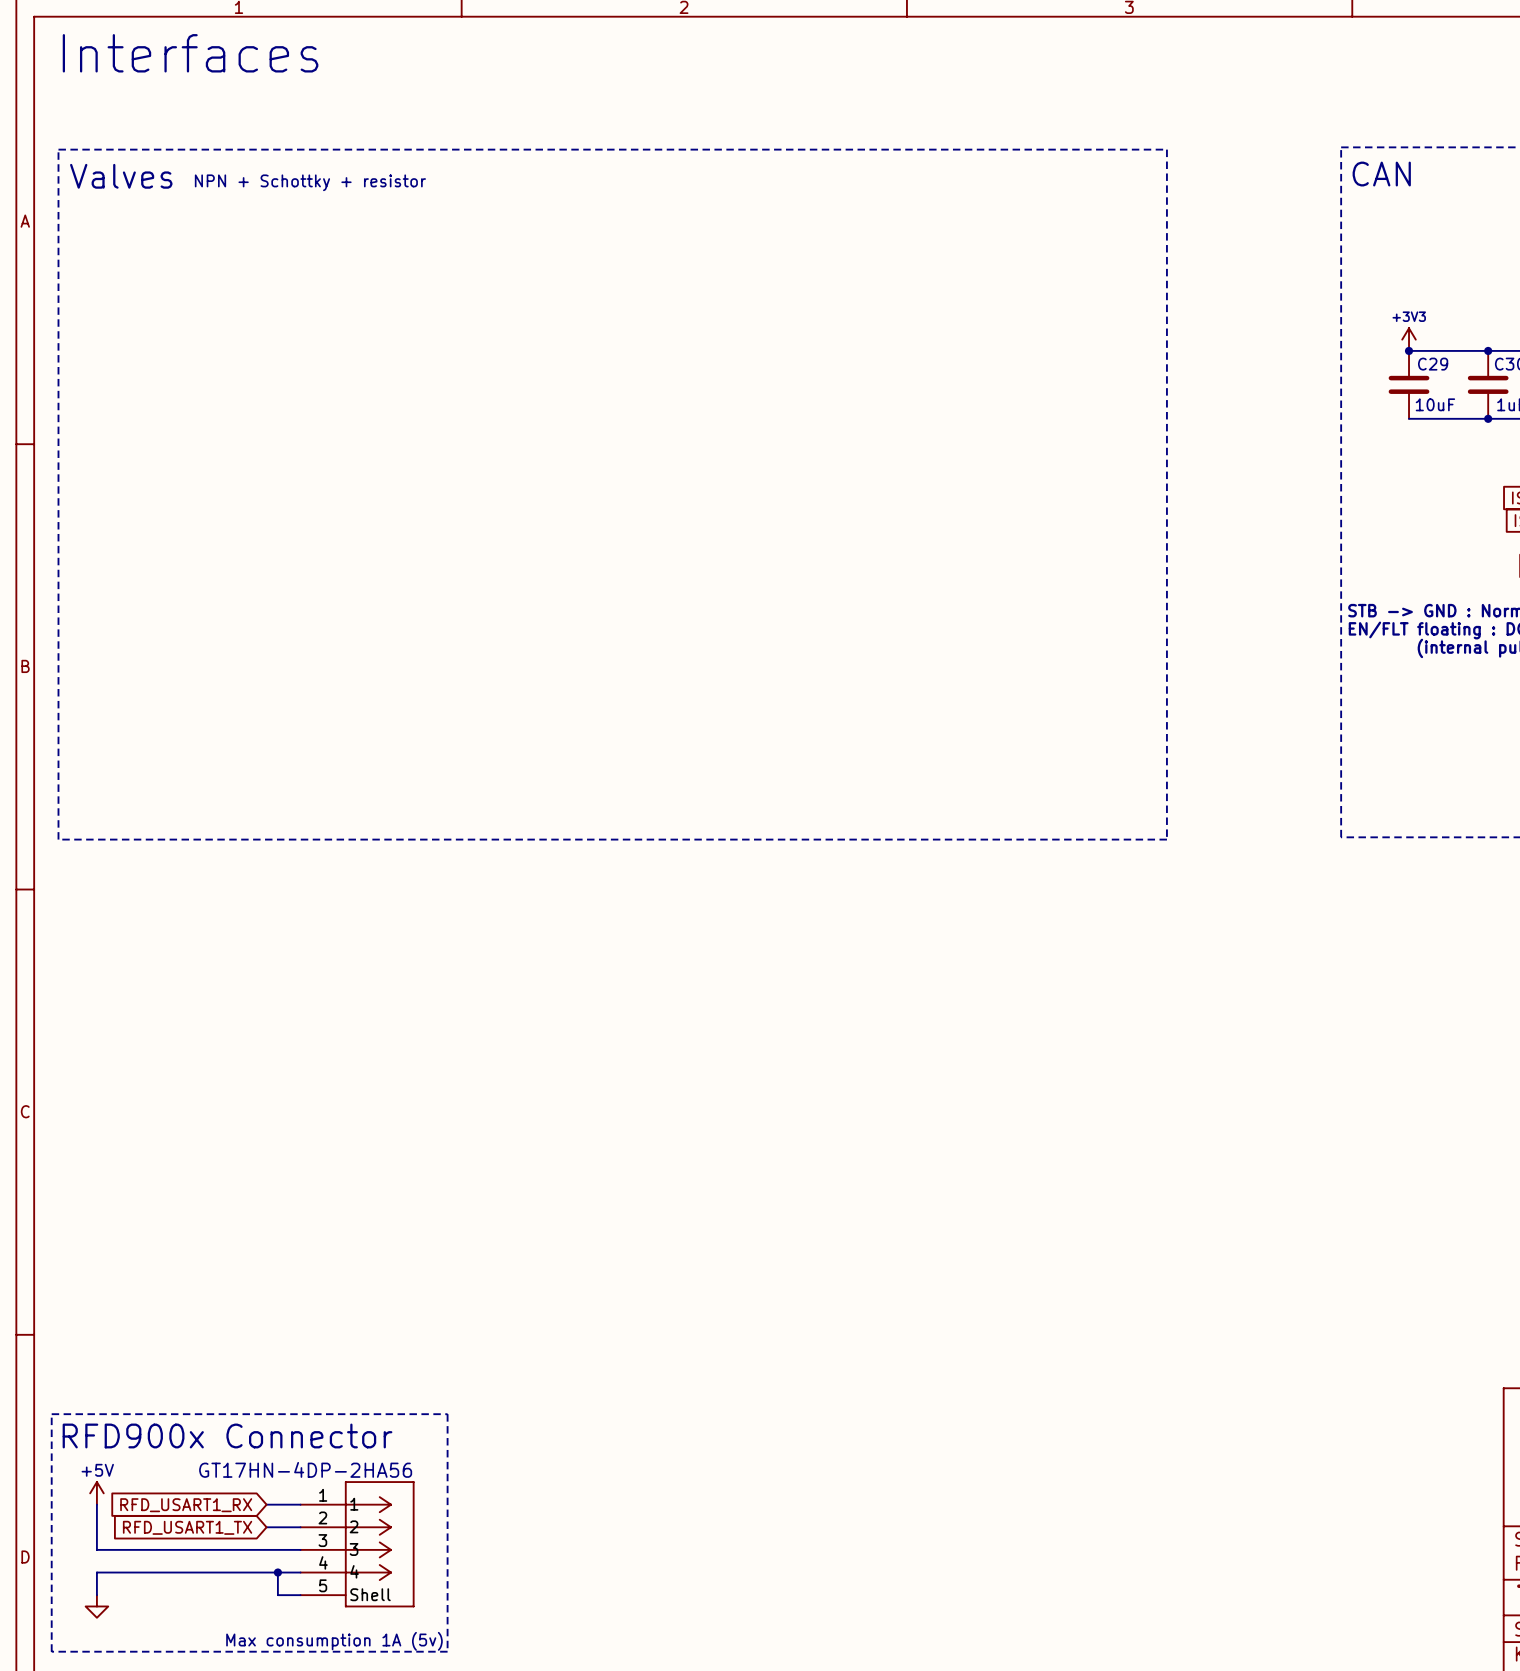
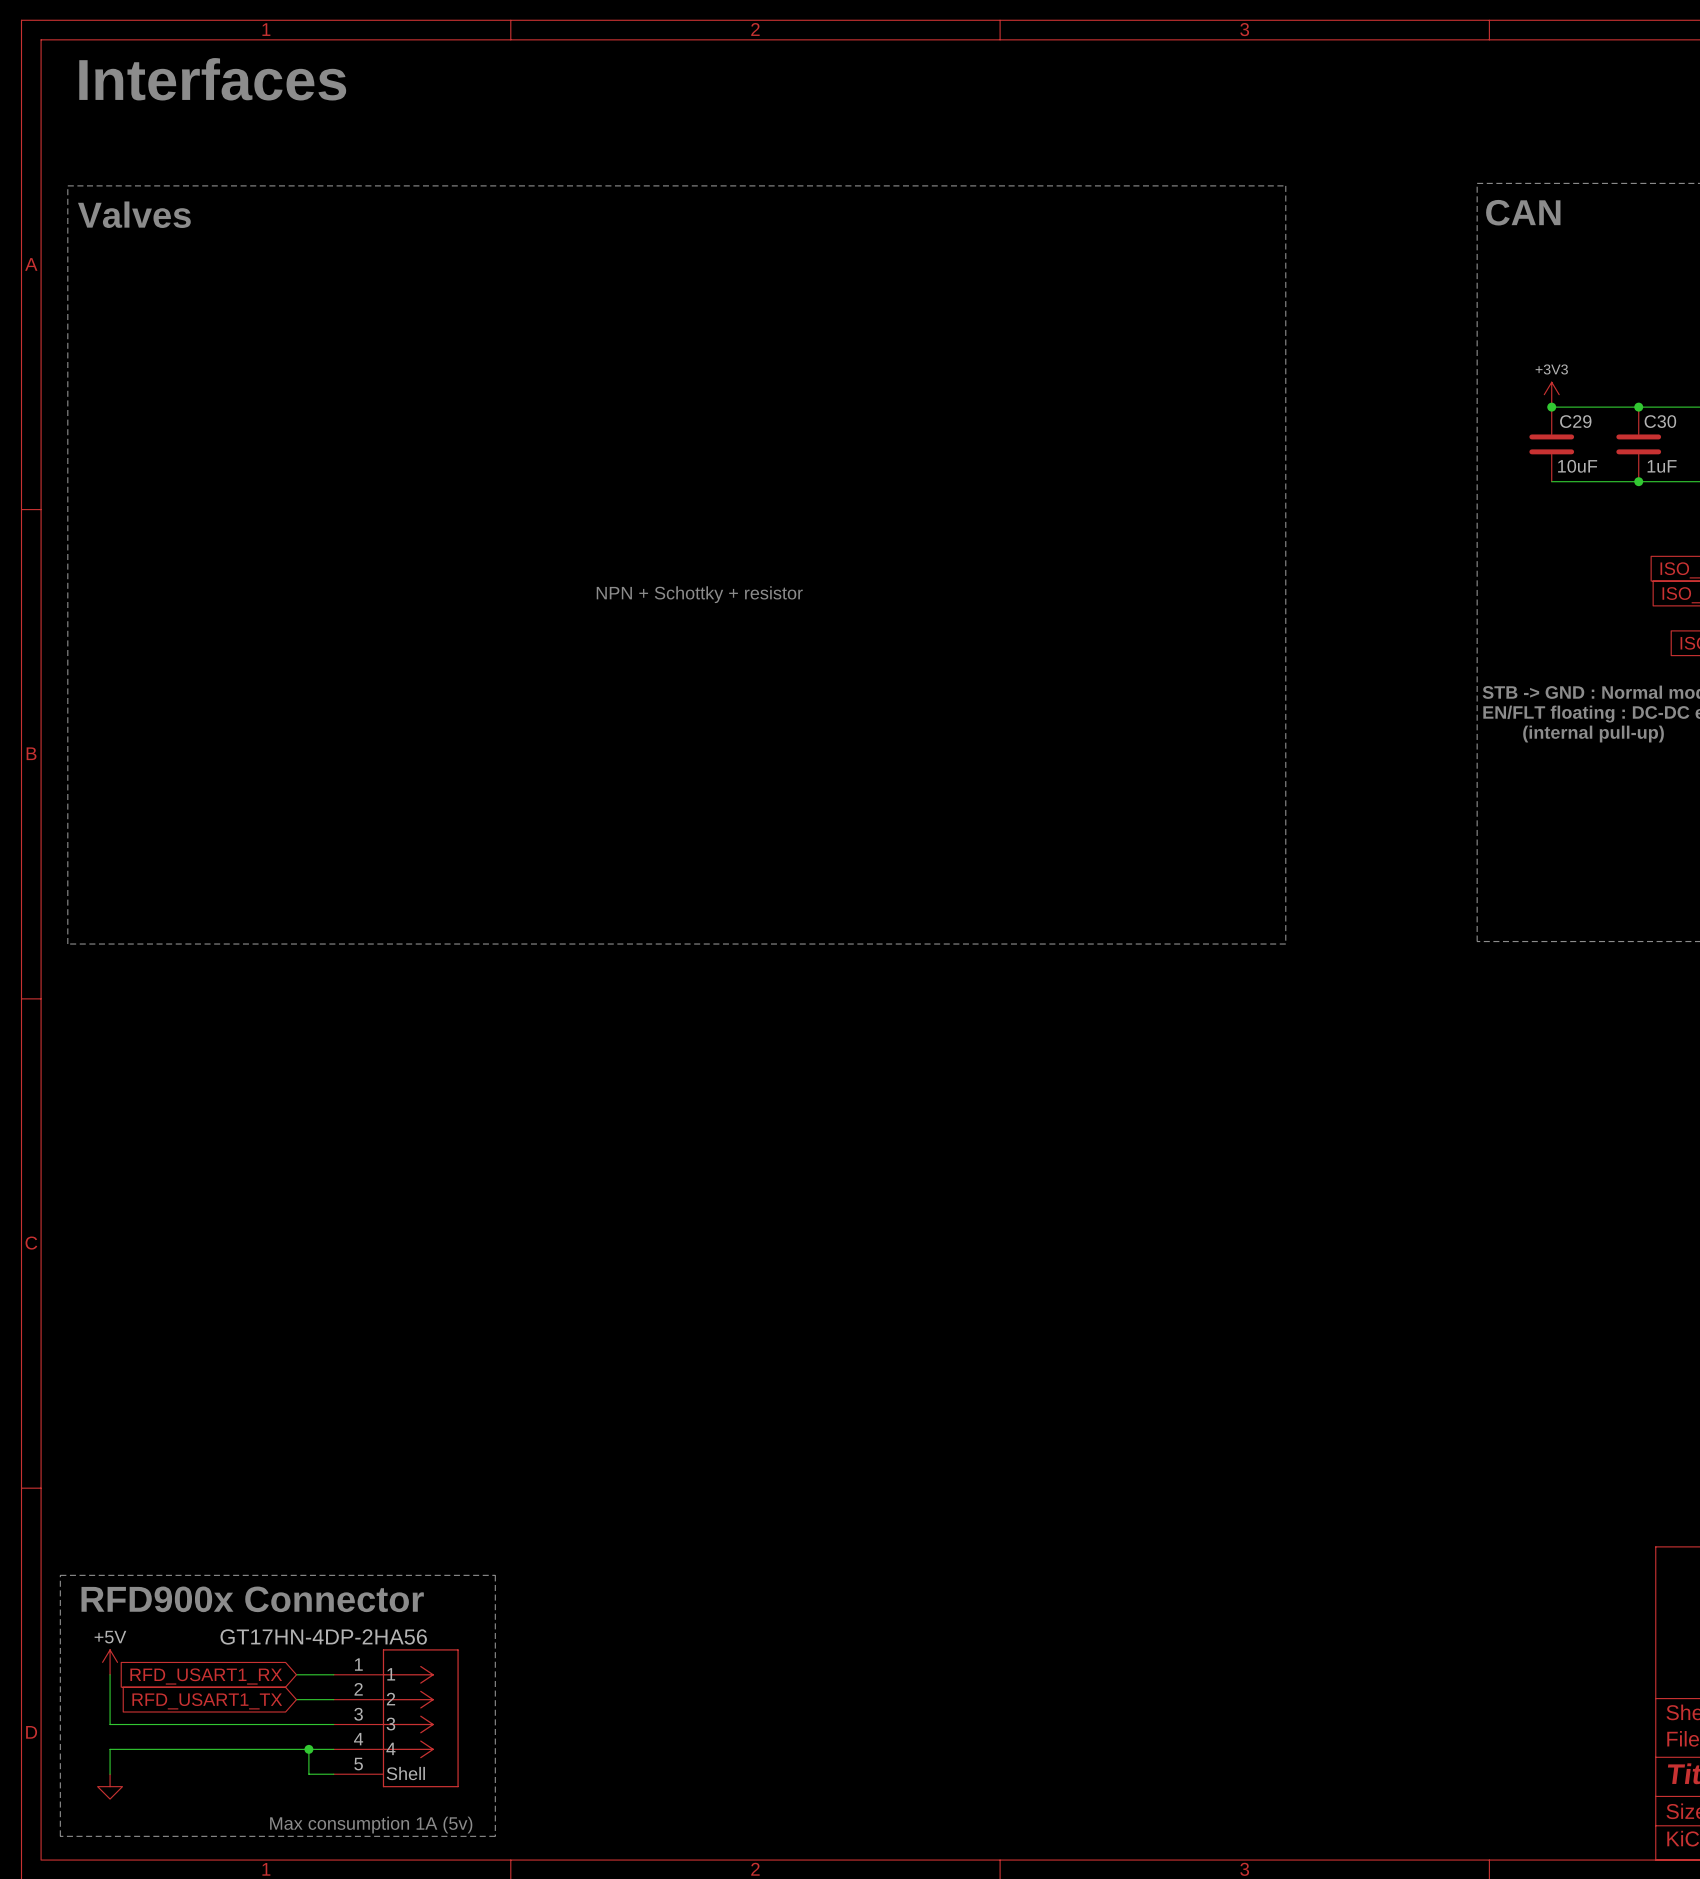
text: NPN + Schottky + resistor (310, 182) -> none
text: none -> NPN + Schottky + resistor (699, 594)

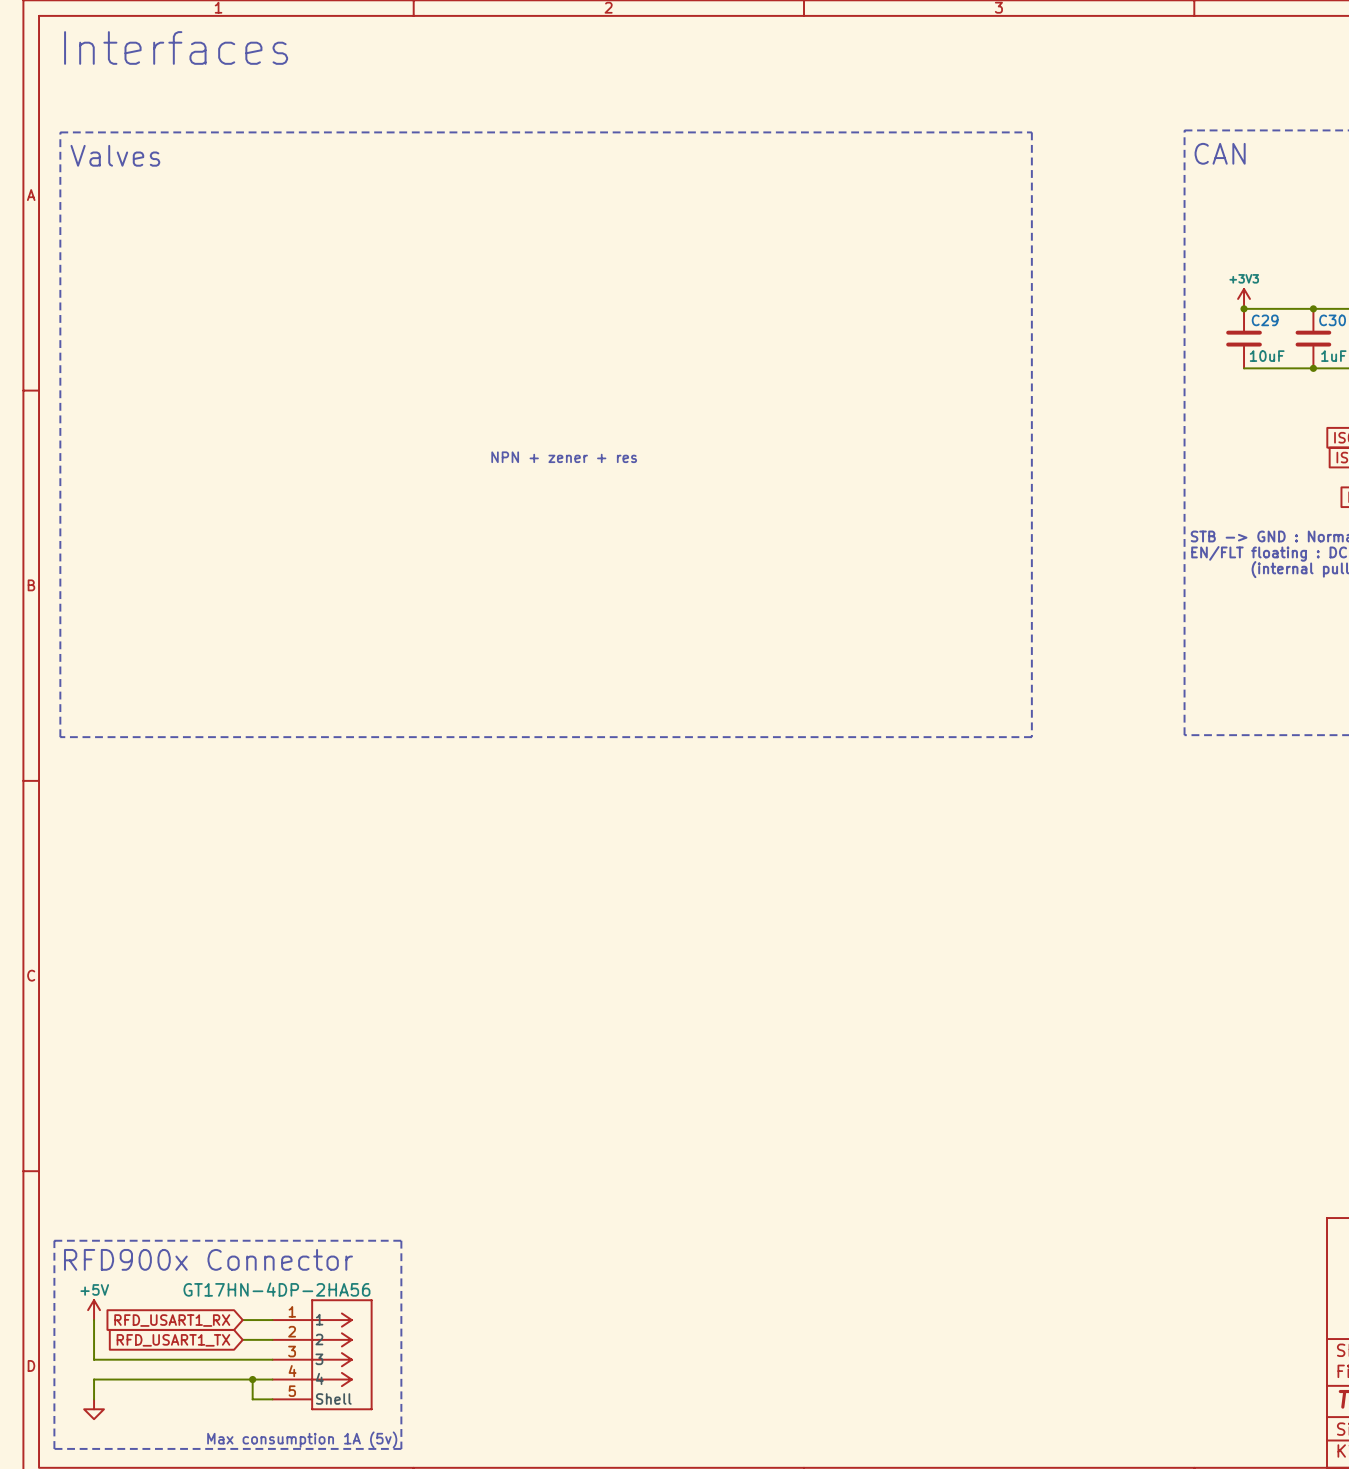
text: NPN + Schottky + resistor (699, 594) -> NPN + zener + res (564, 457)

